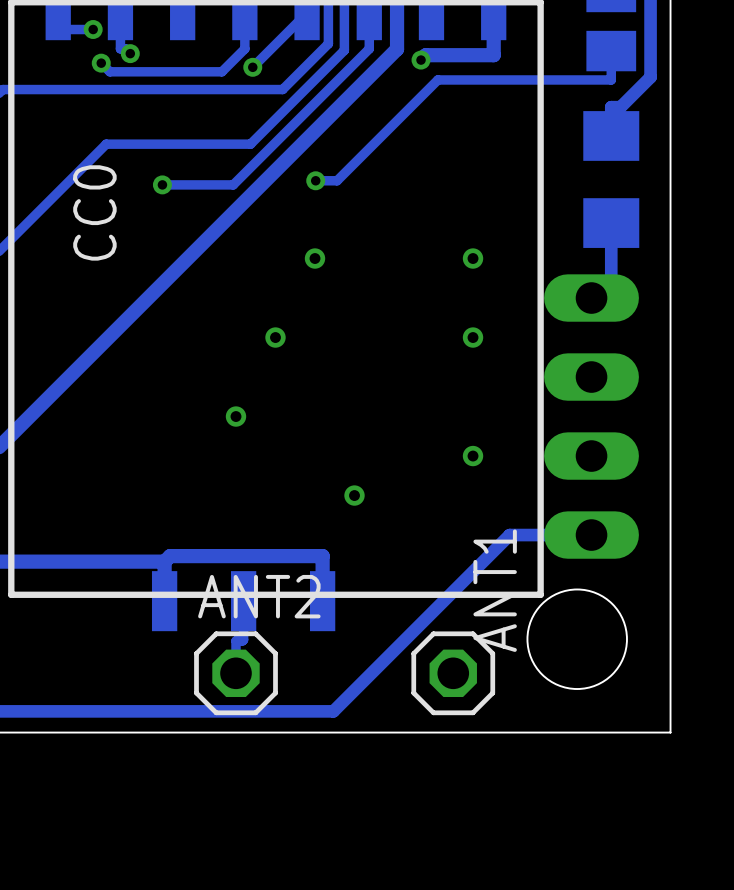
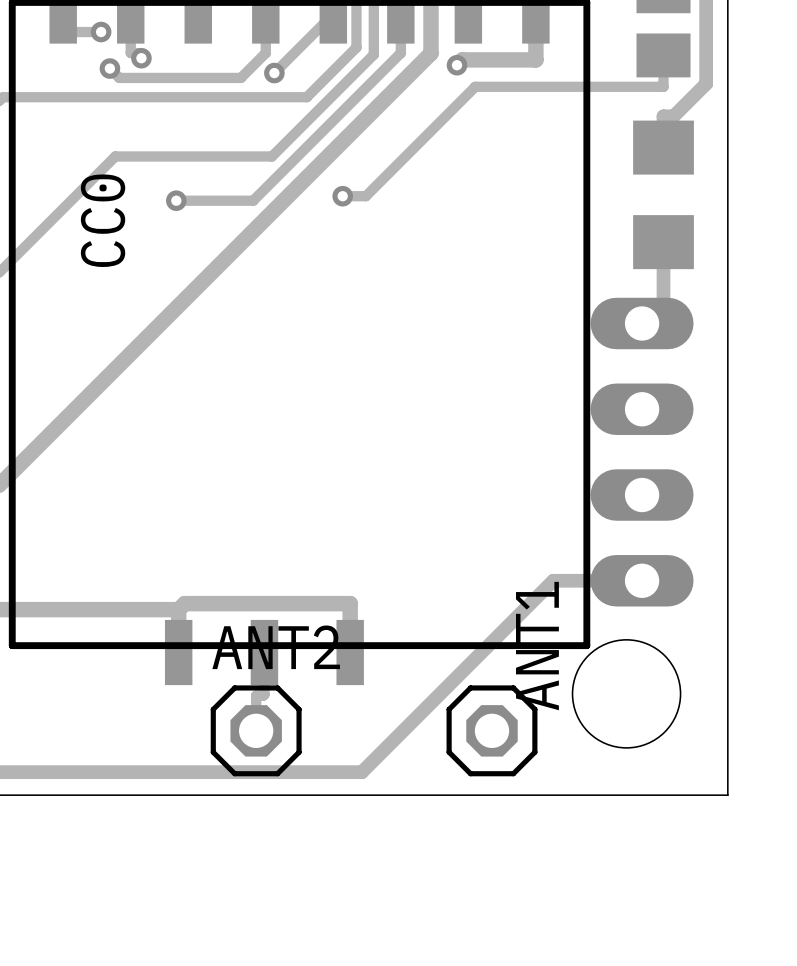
via: (315, 258) -> none
via: (473, 258) -> none
via: (275, 337) -> none
via: (473, 337) -> none
via: (236, 416) -> none
via: (473, 456) -> none
via: (354, 495) -> none

